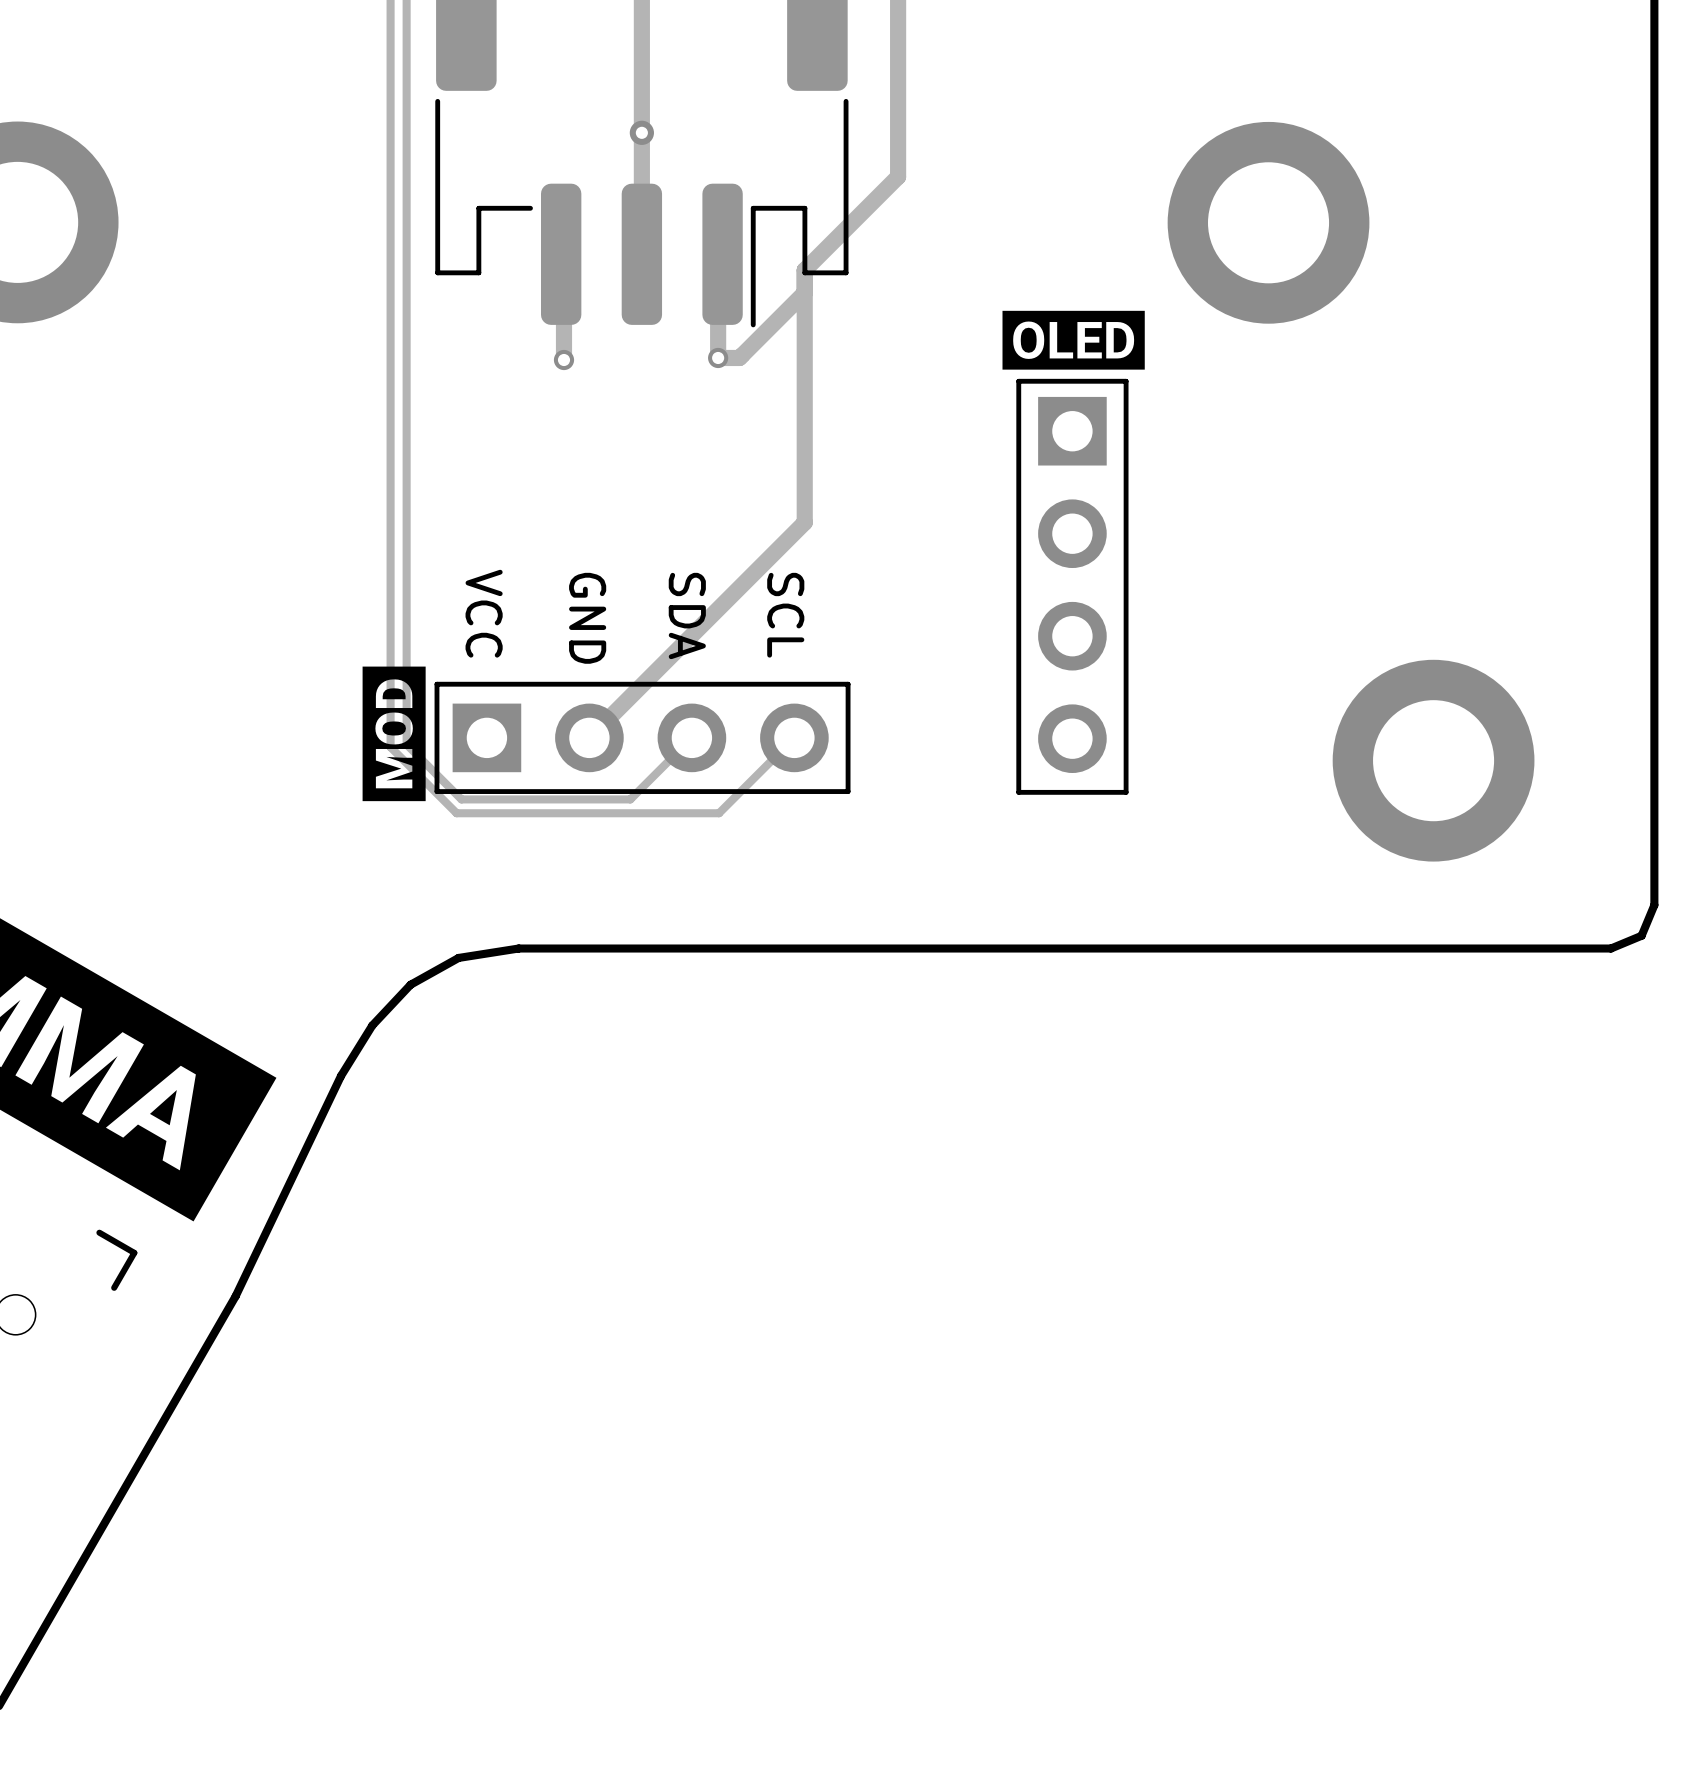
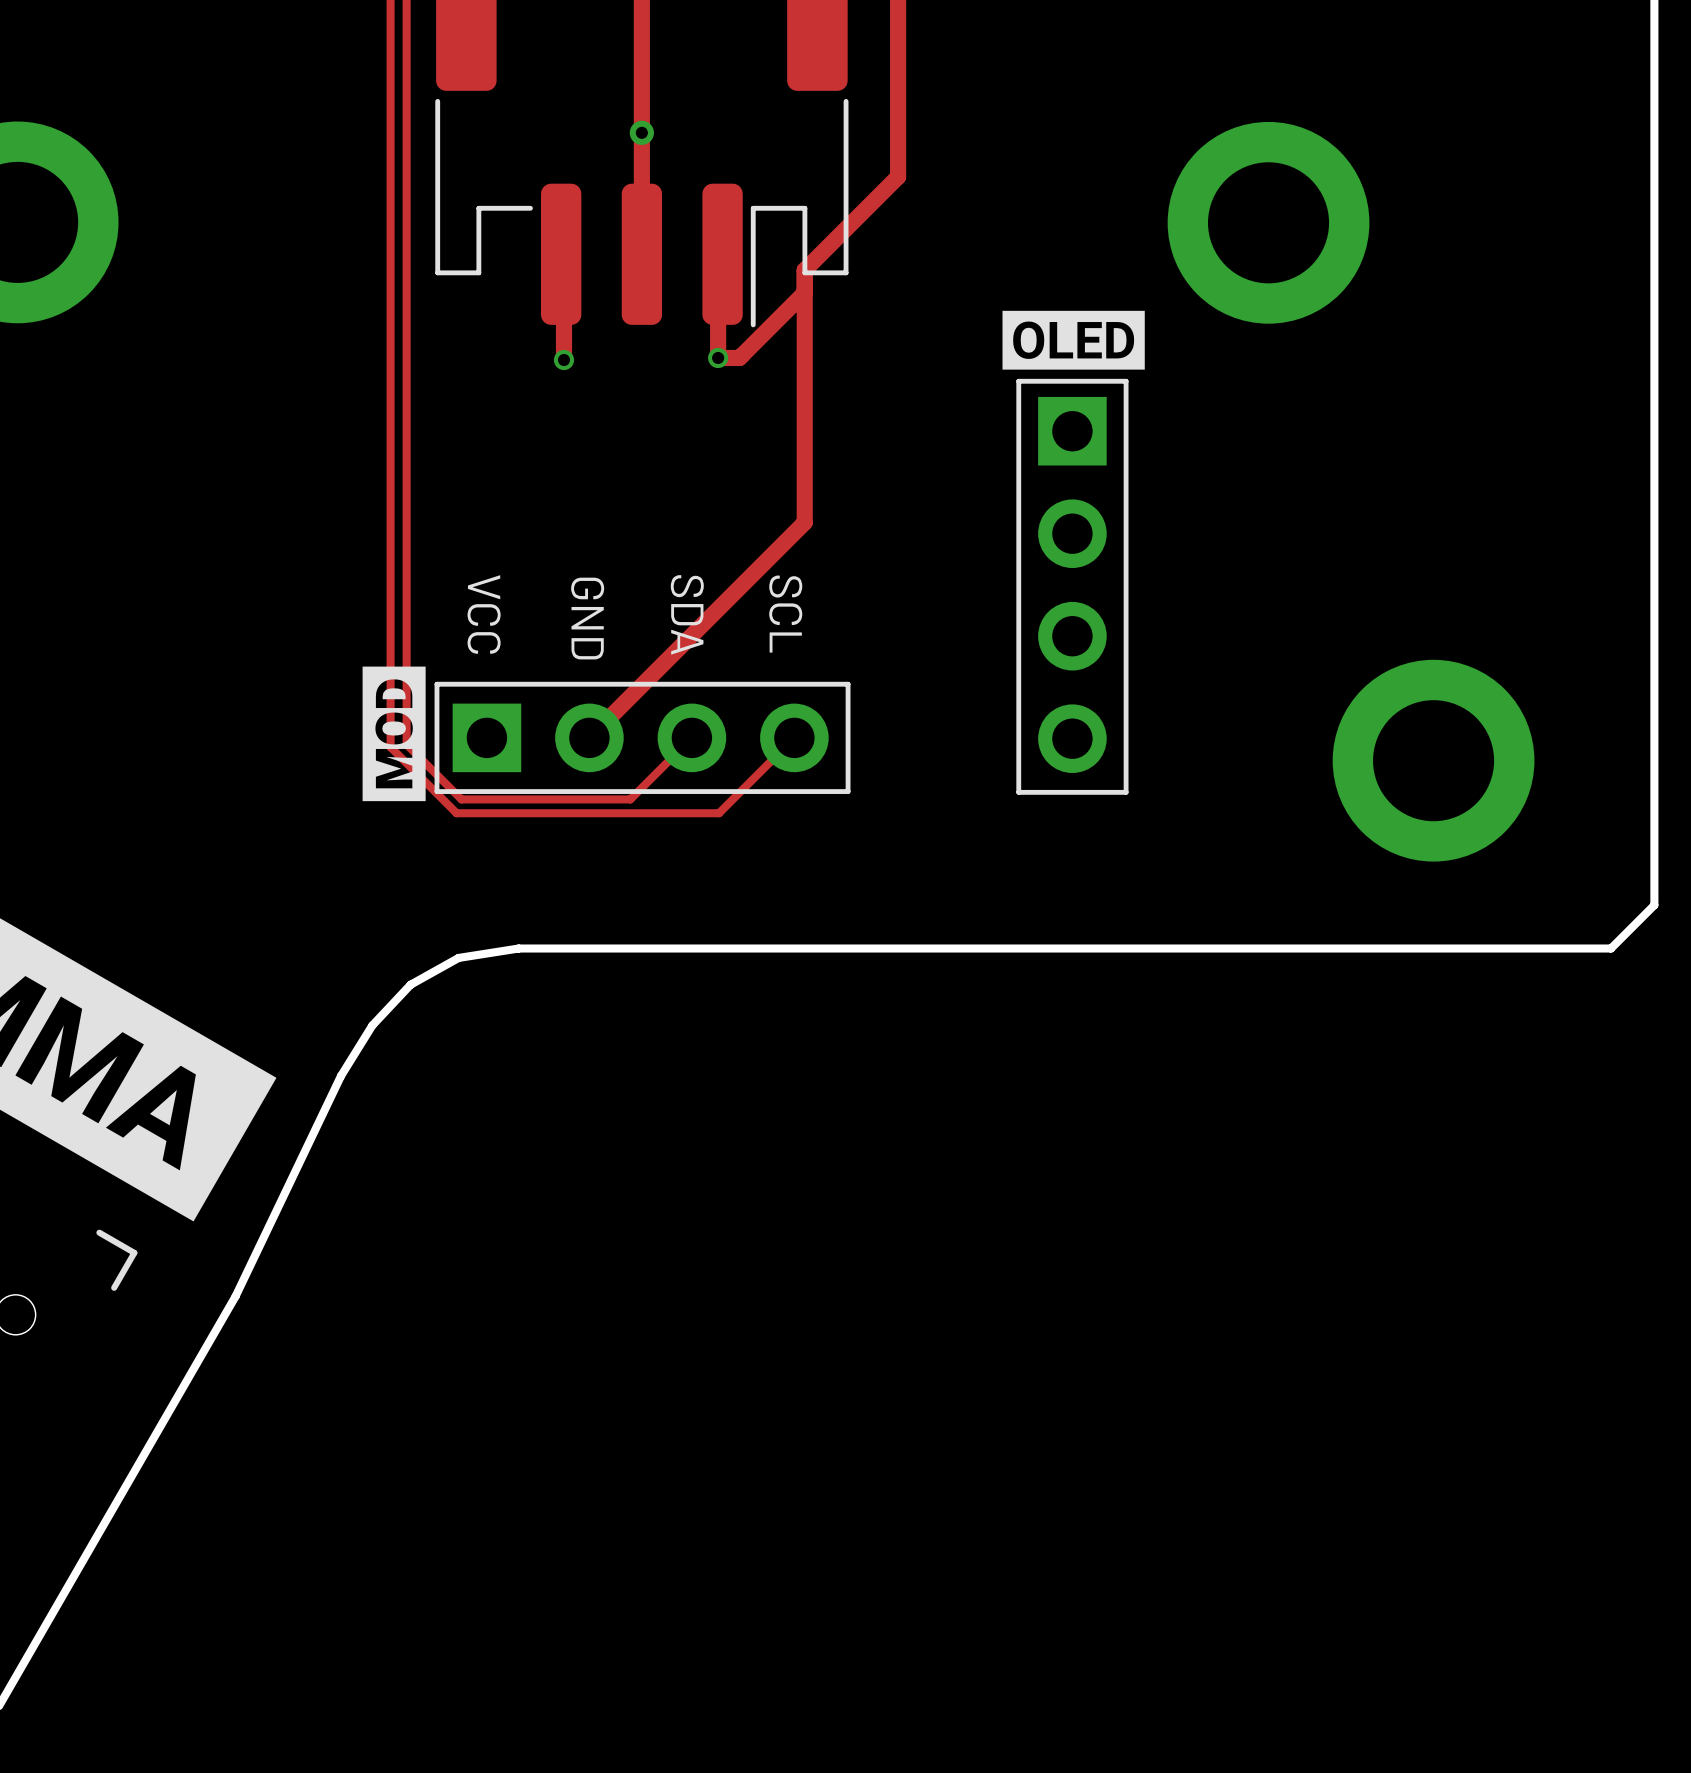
board edge: (1654, 905) (1641, 935) (1611, 948) -> (1654, 905) (1611, 948)

